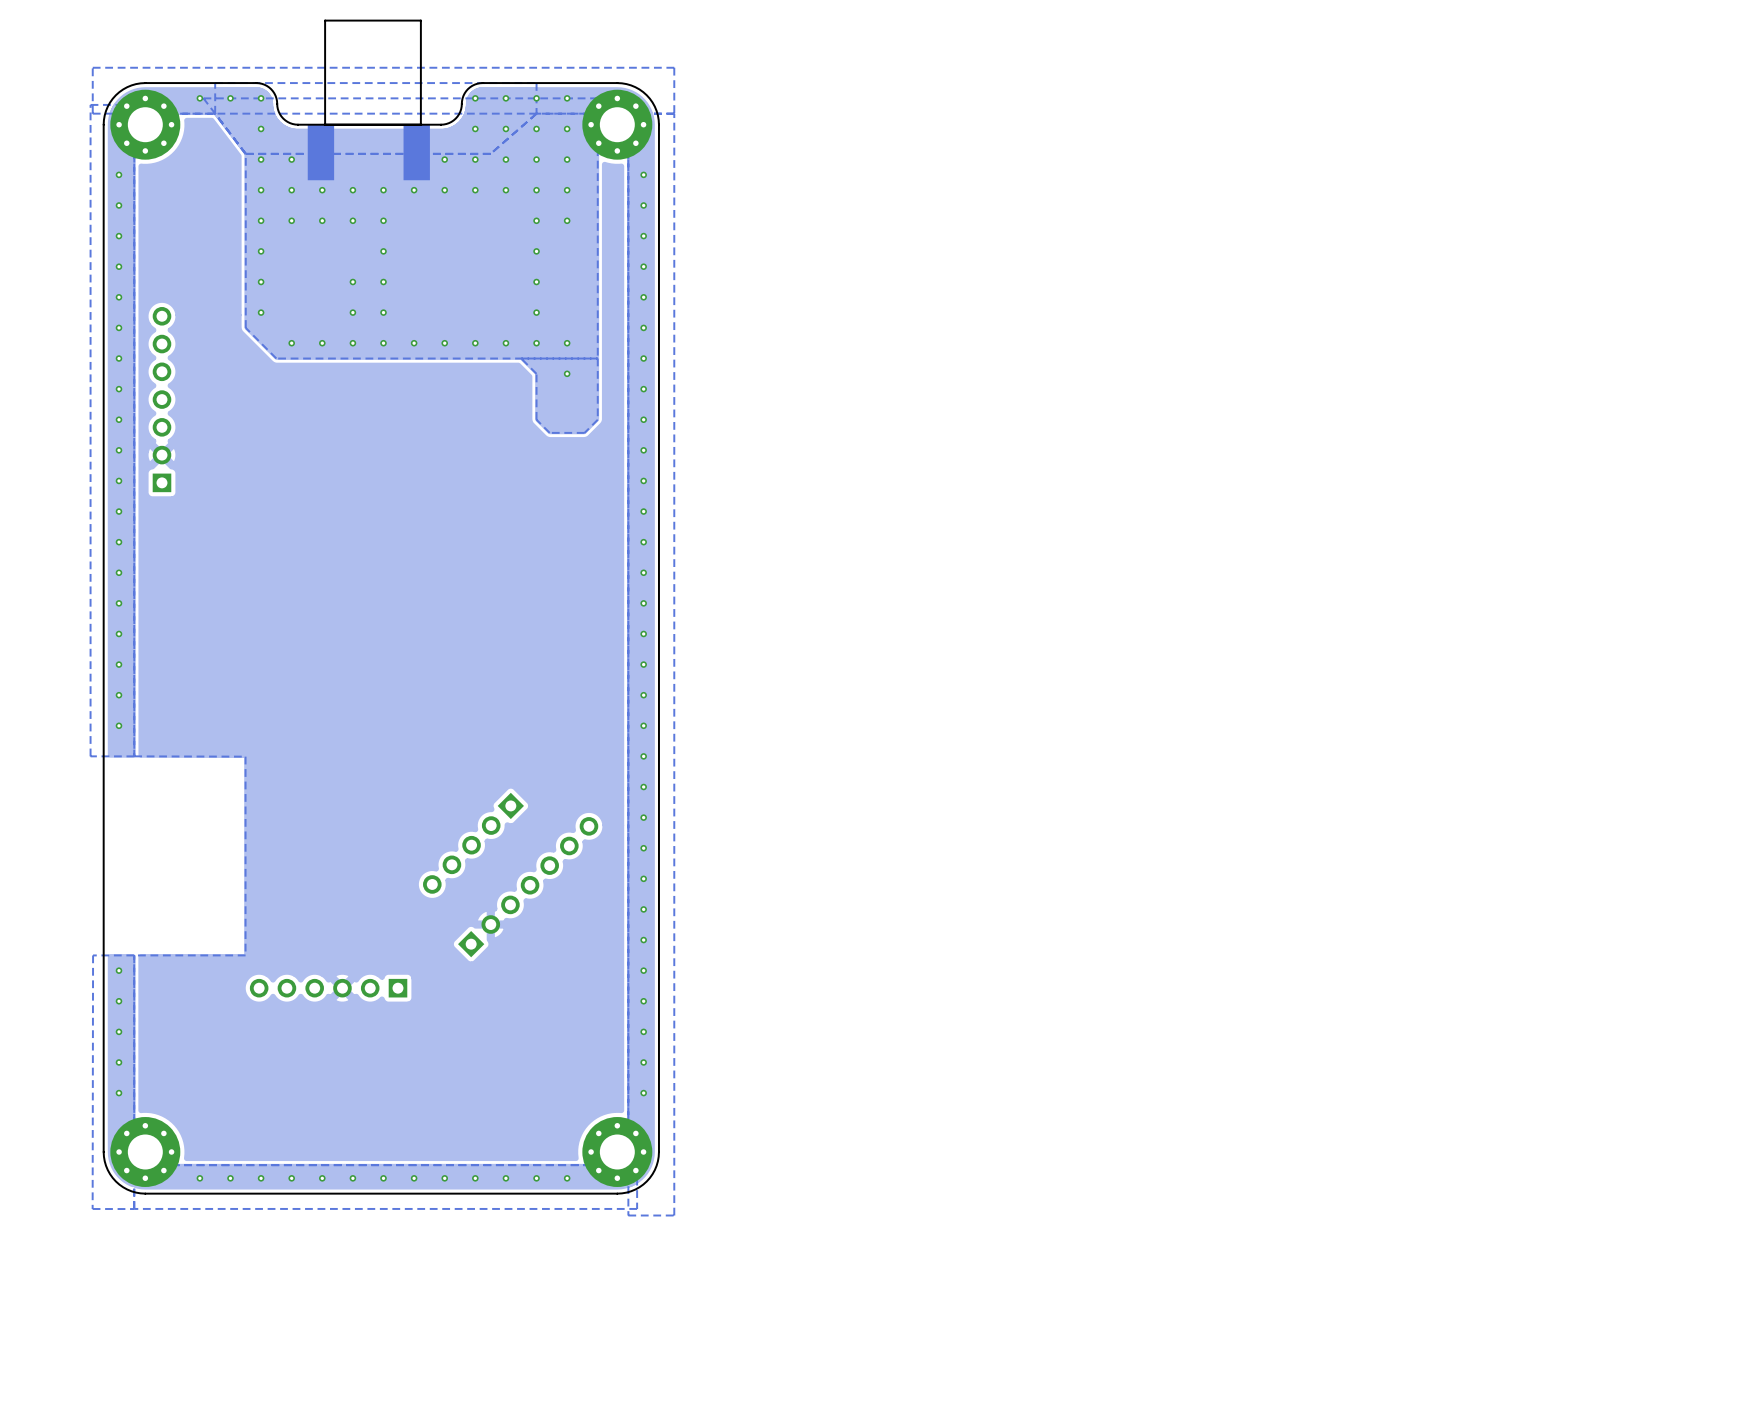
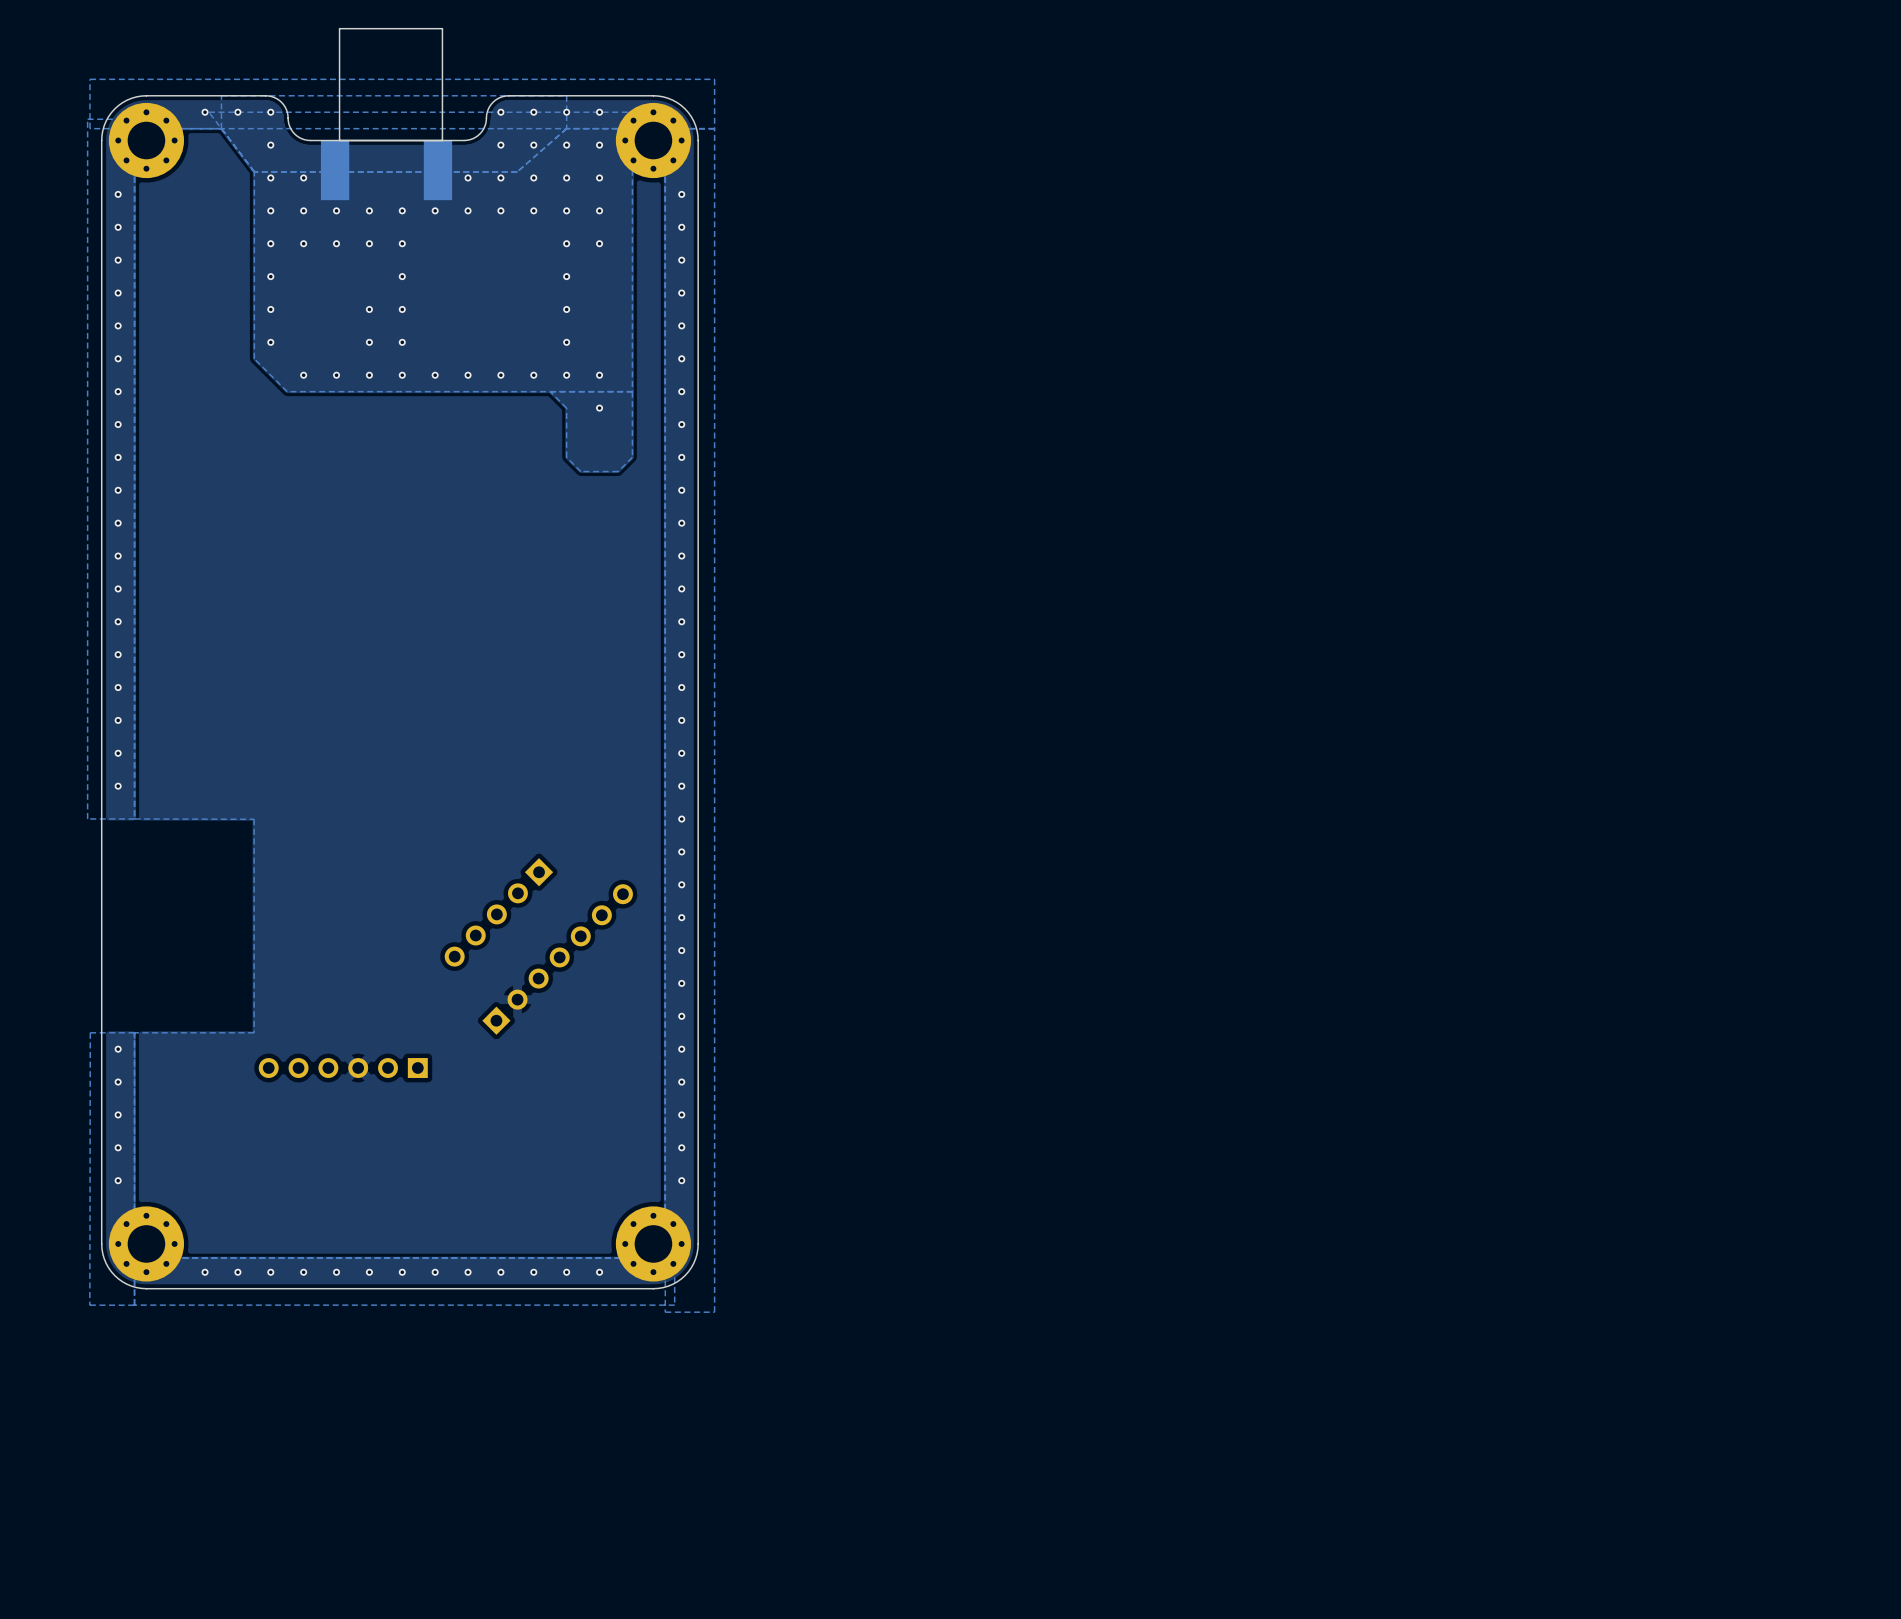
part: (161, 399) -> none

